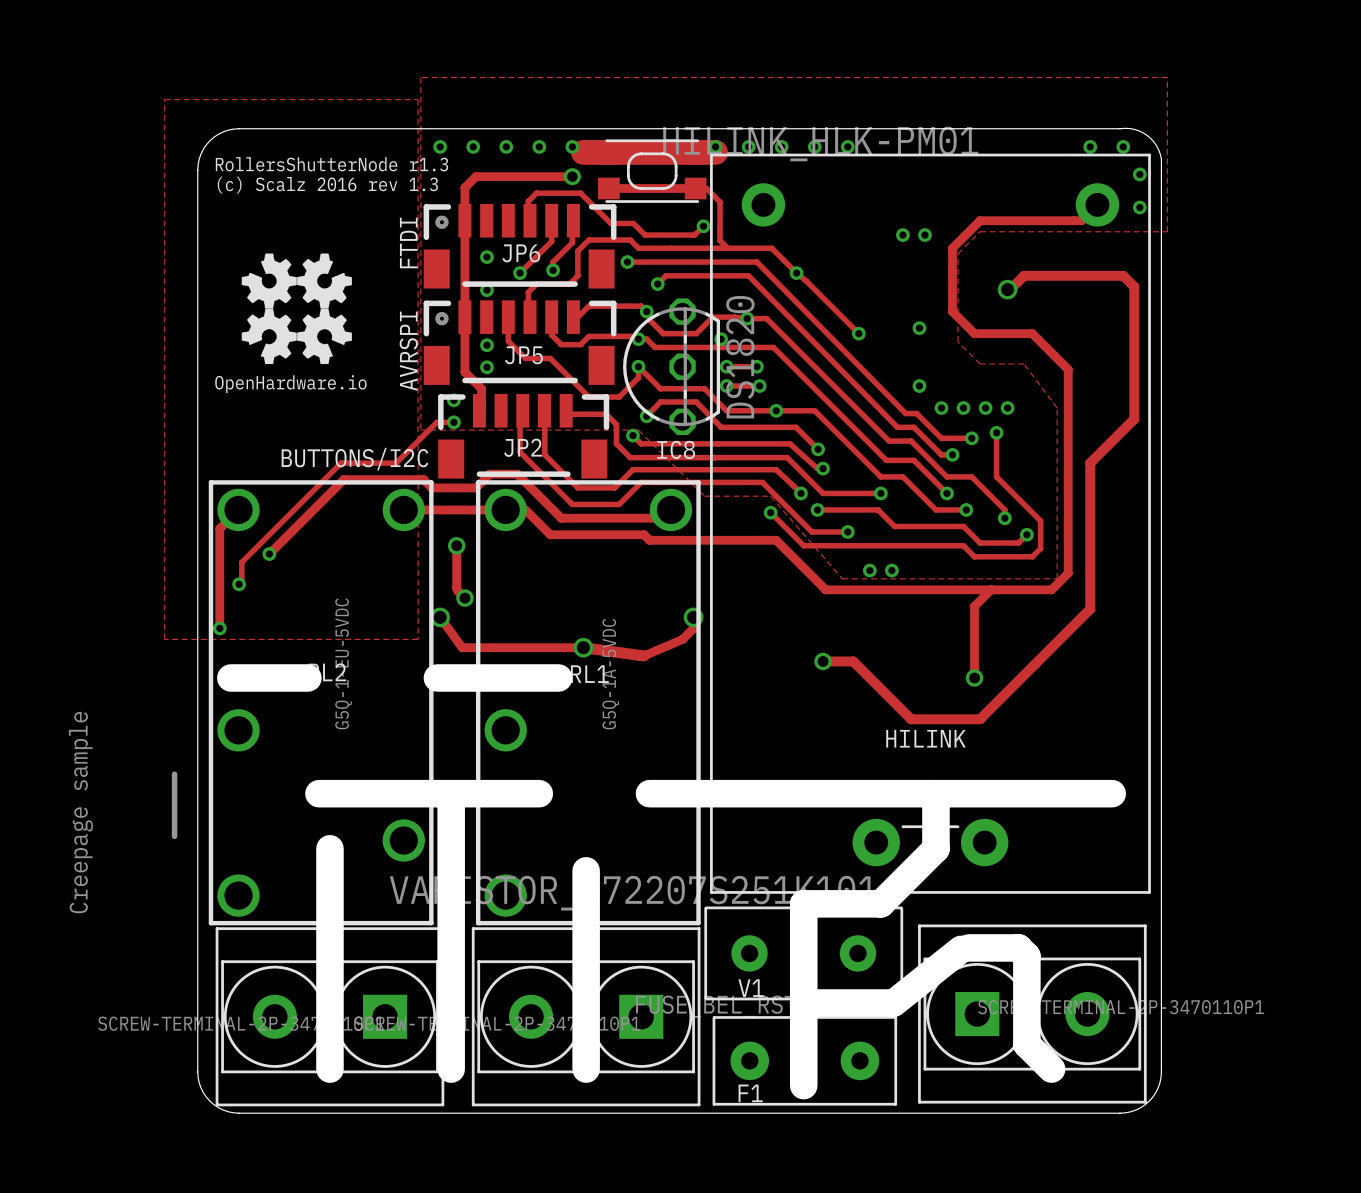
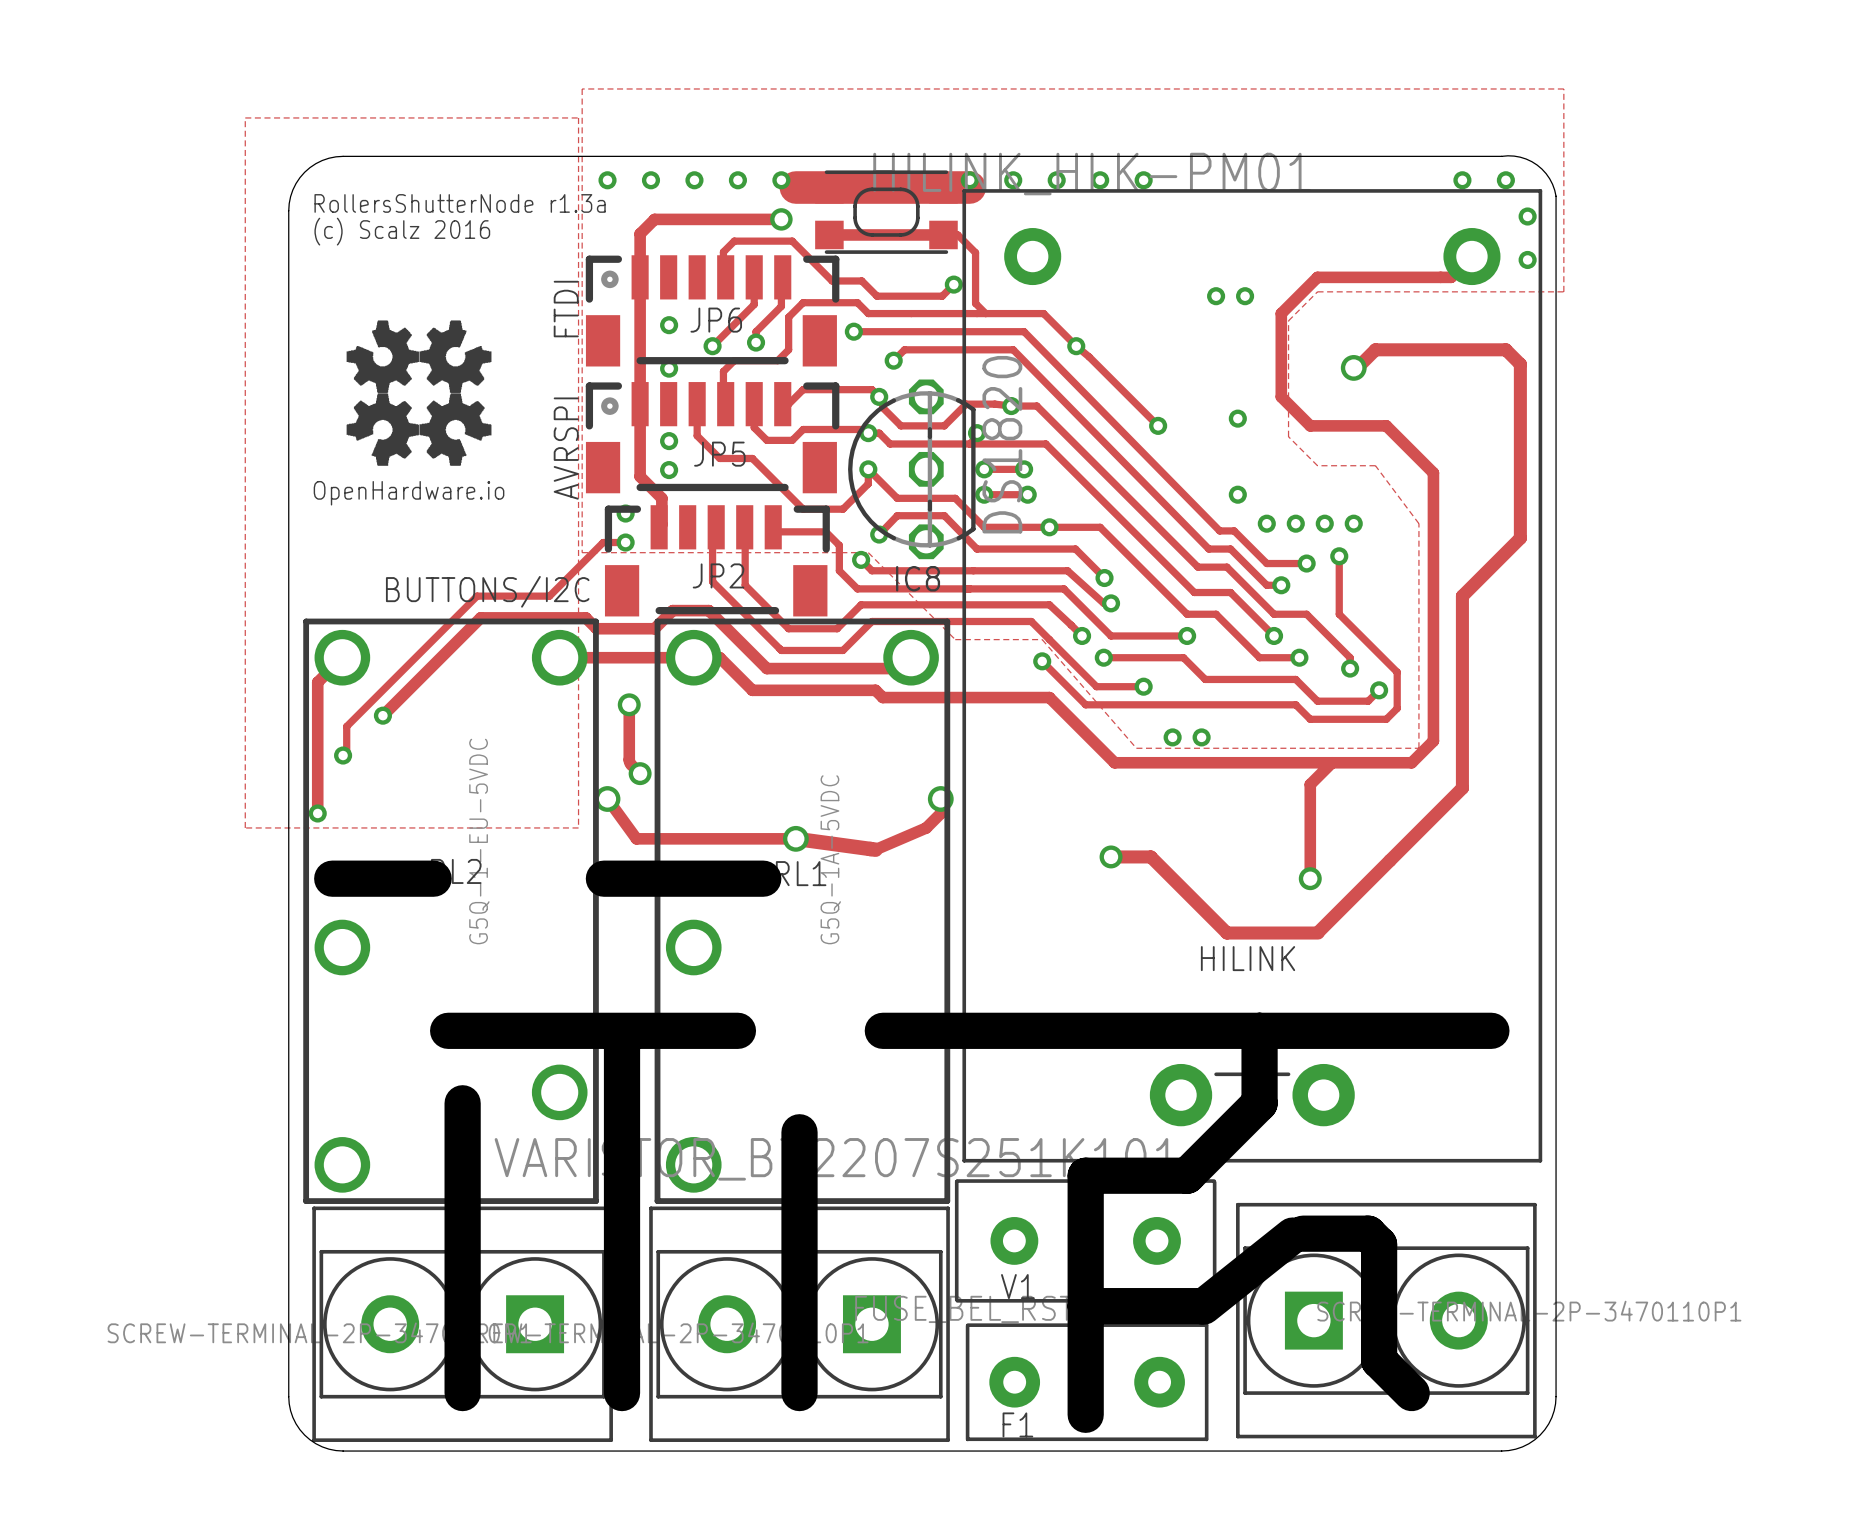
text: RollersShutterNode r1.3 (331, 164) -> RollersShutterNode r1.3a (460, 203)
text: (c) Scalz 2016 rev 1.3 (327, 185) -> (c) Scalz 2016 (402, 231)
line: (174, 774) (174, 836) -> none
text: Creepage sample (80, 812) -> none

